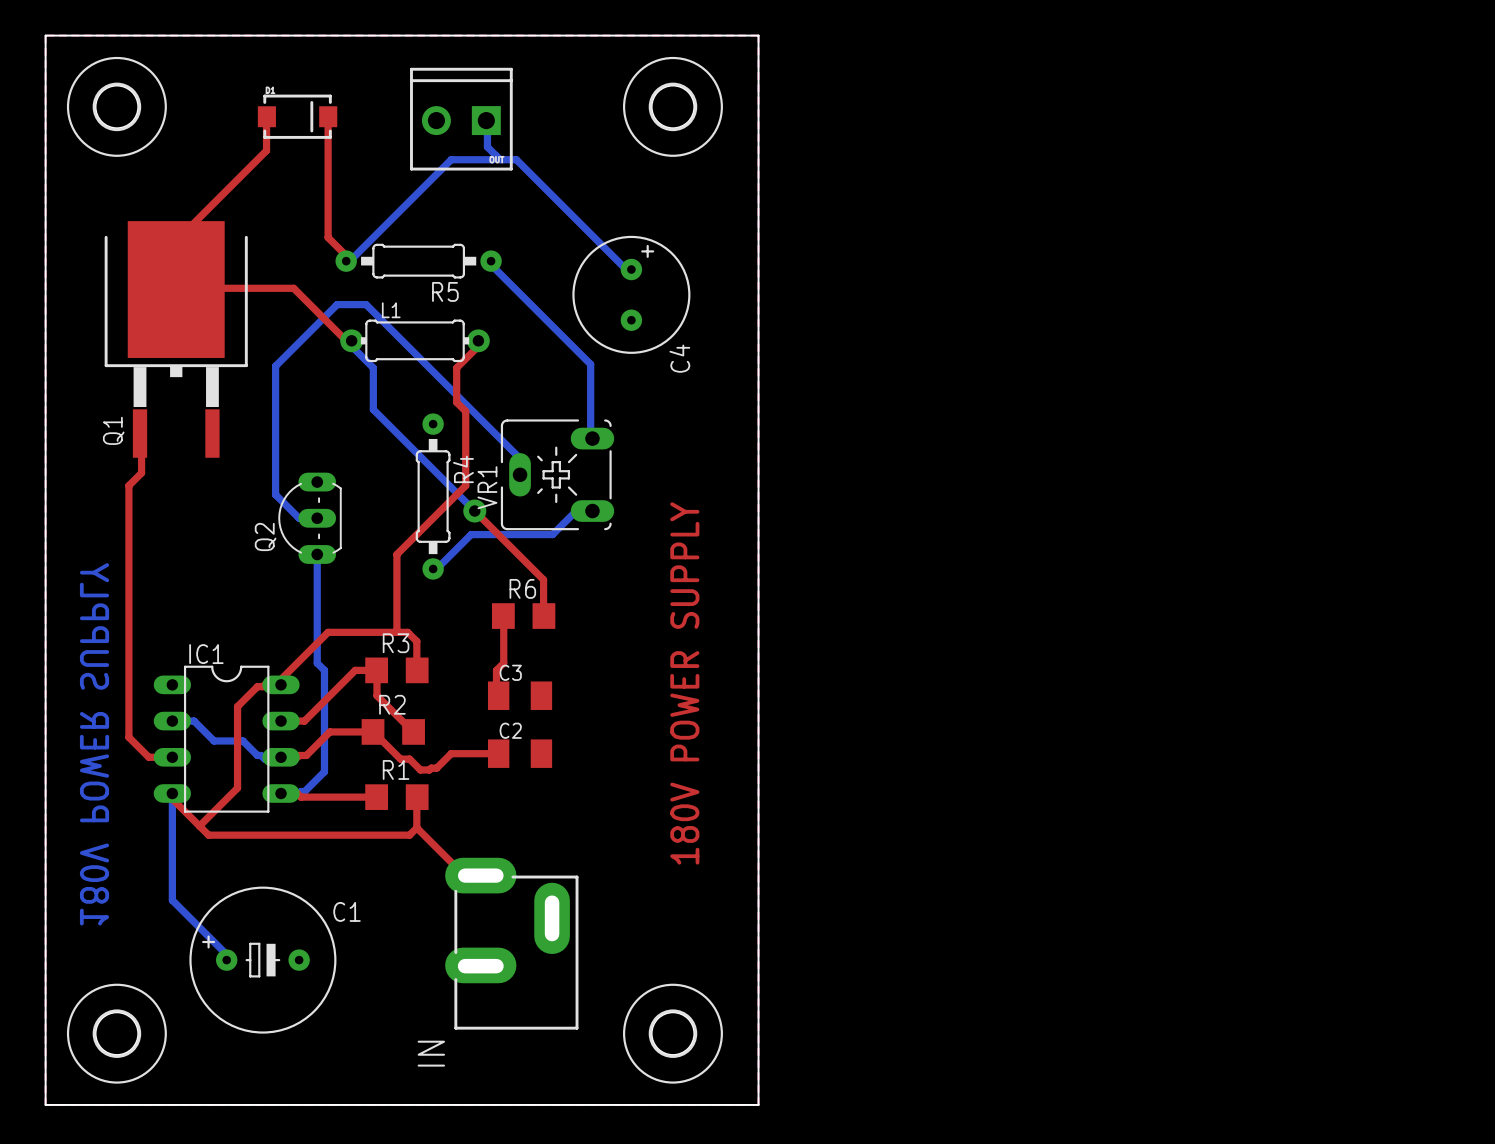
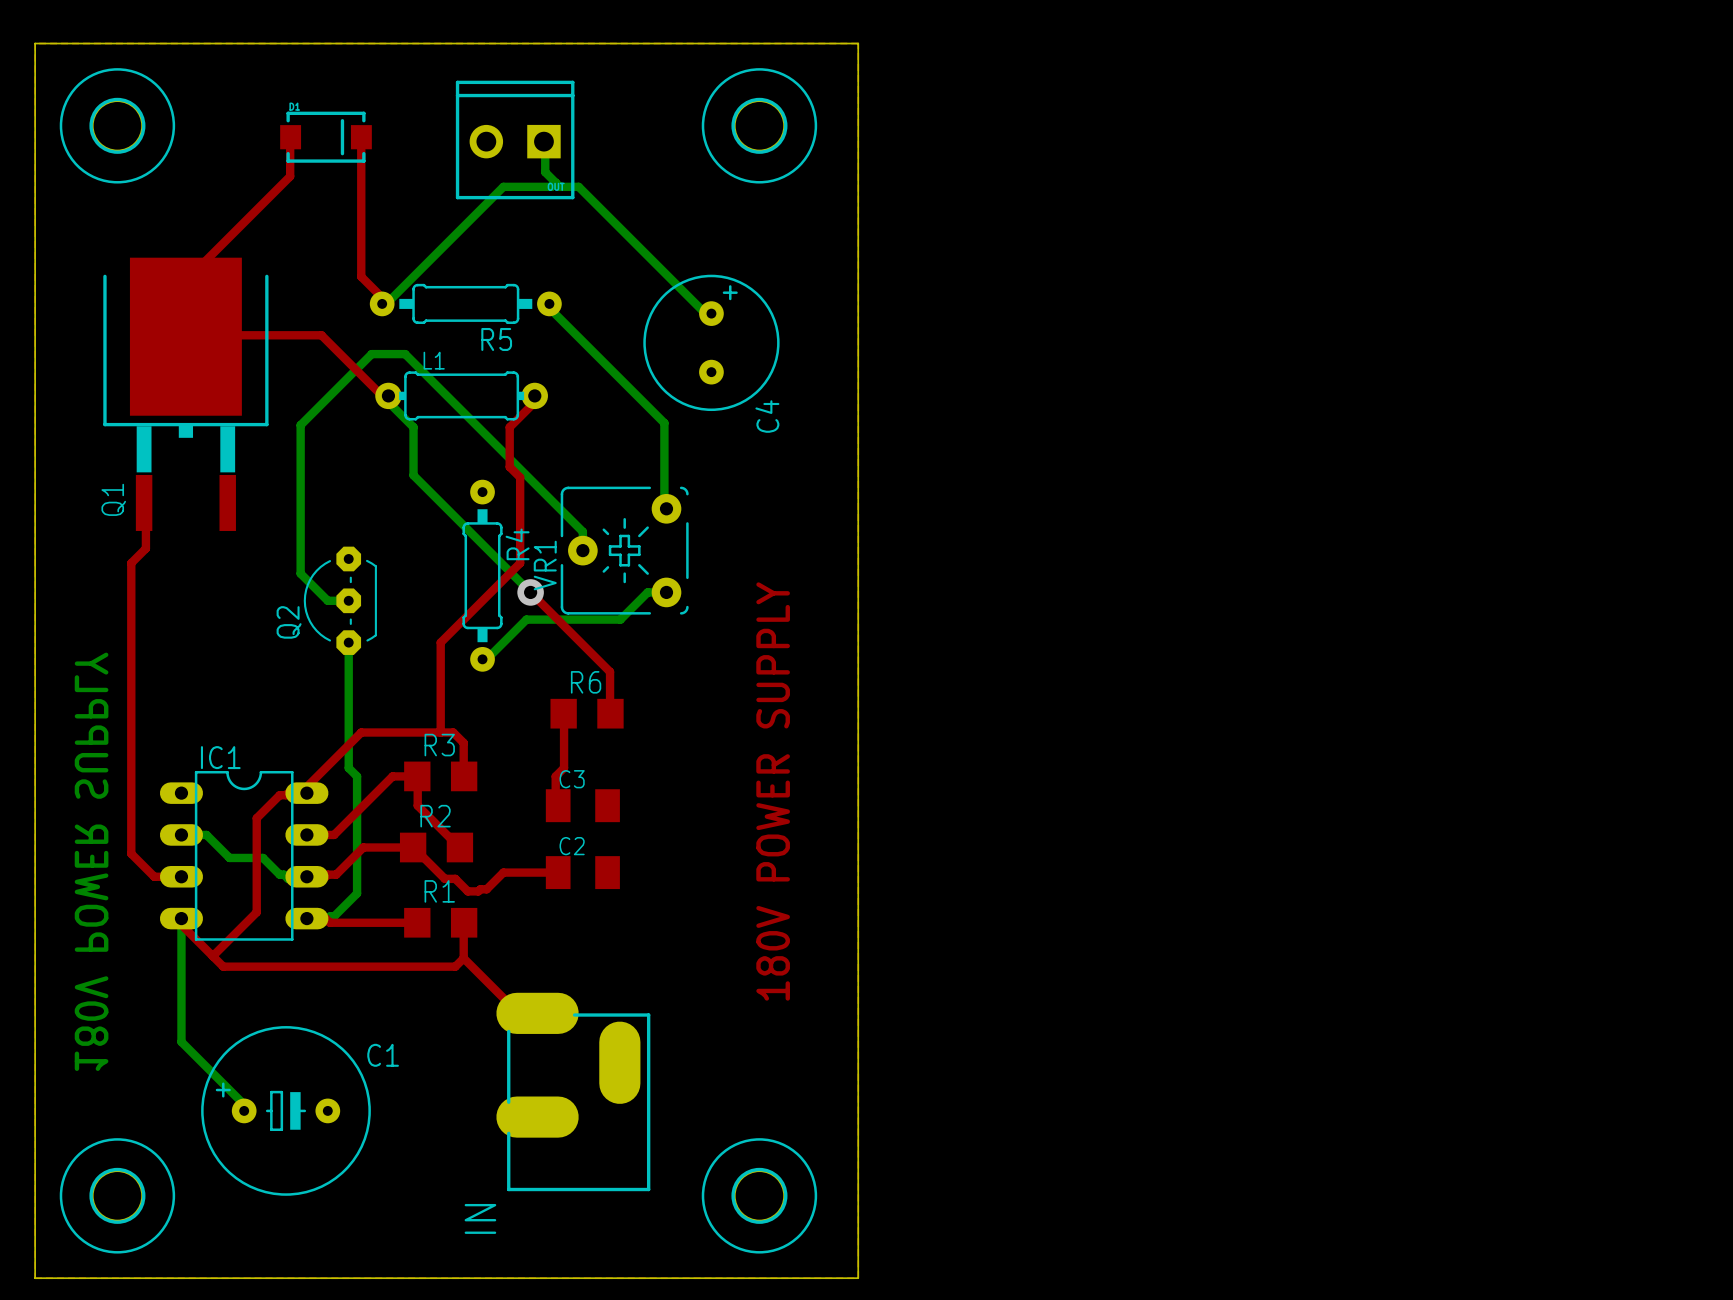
VR1 footprint: [500, 419, 615, 531] -> [560, 486, 689, 615]
Q2 footprint: [278, 472, 342, 564] -> [303, 546, 377, 655]

